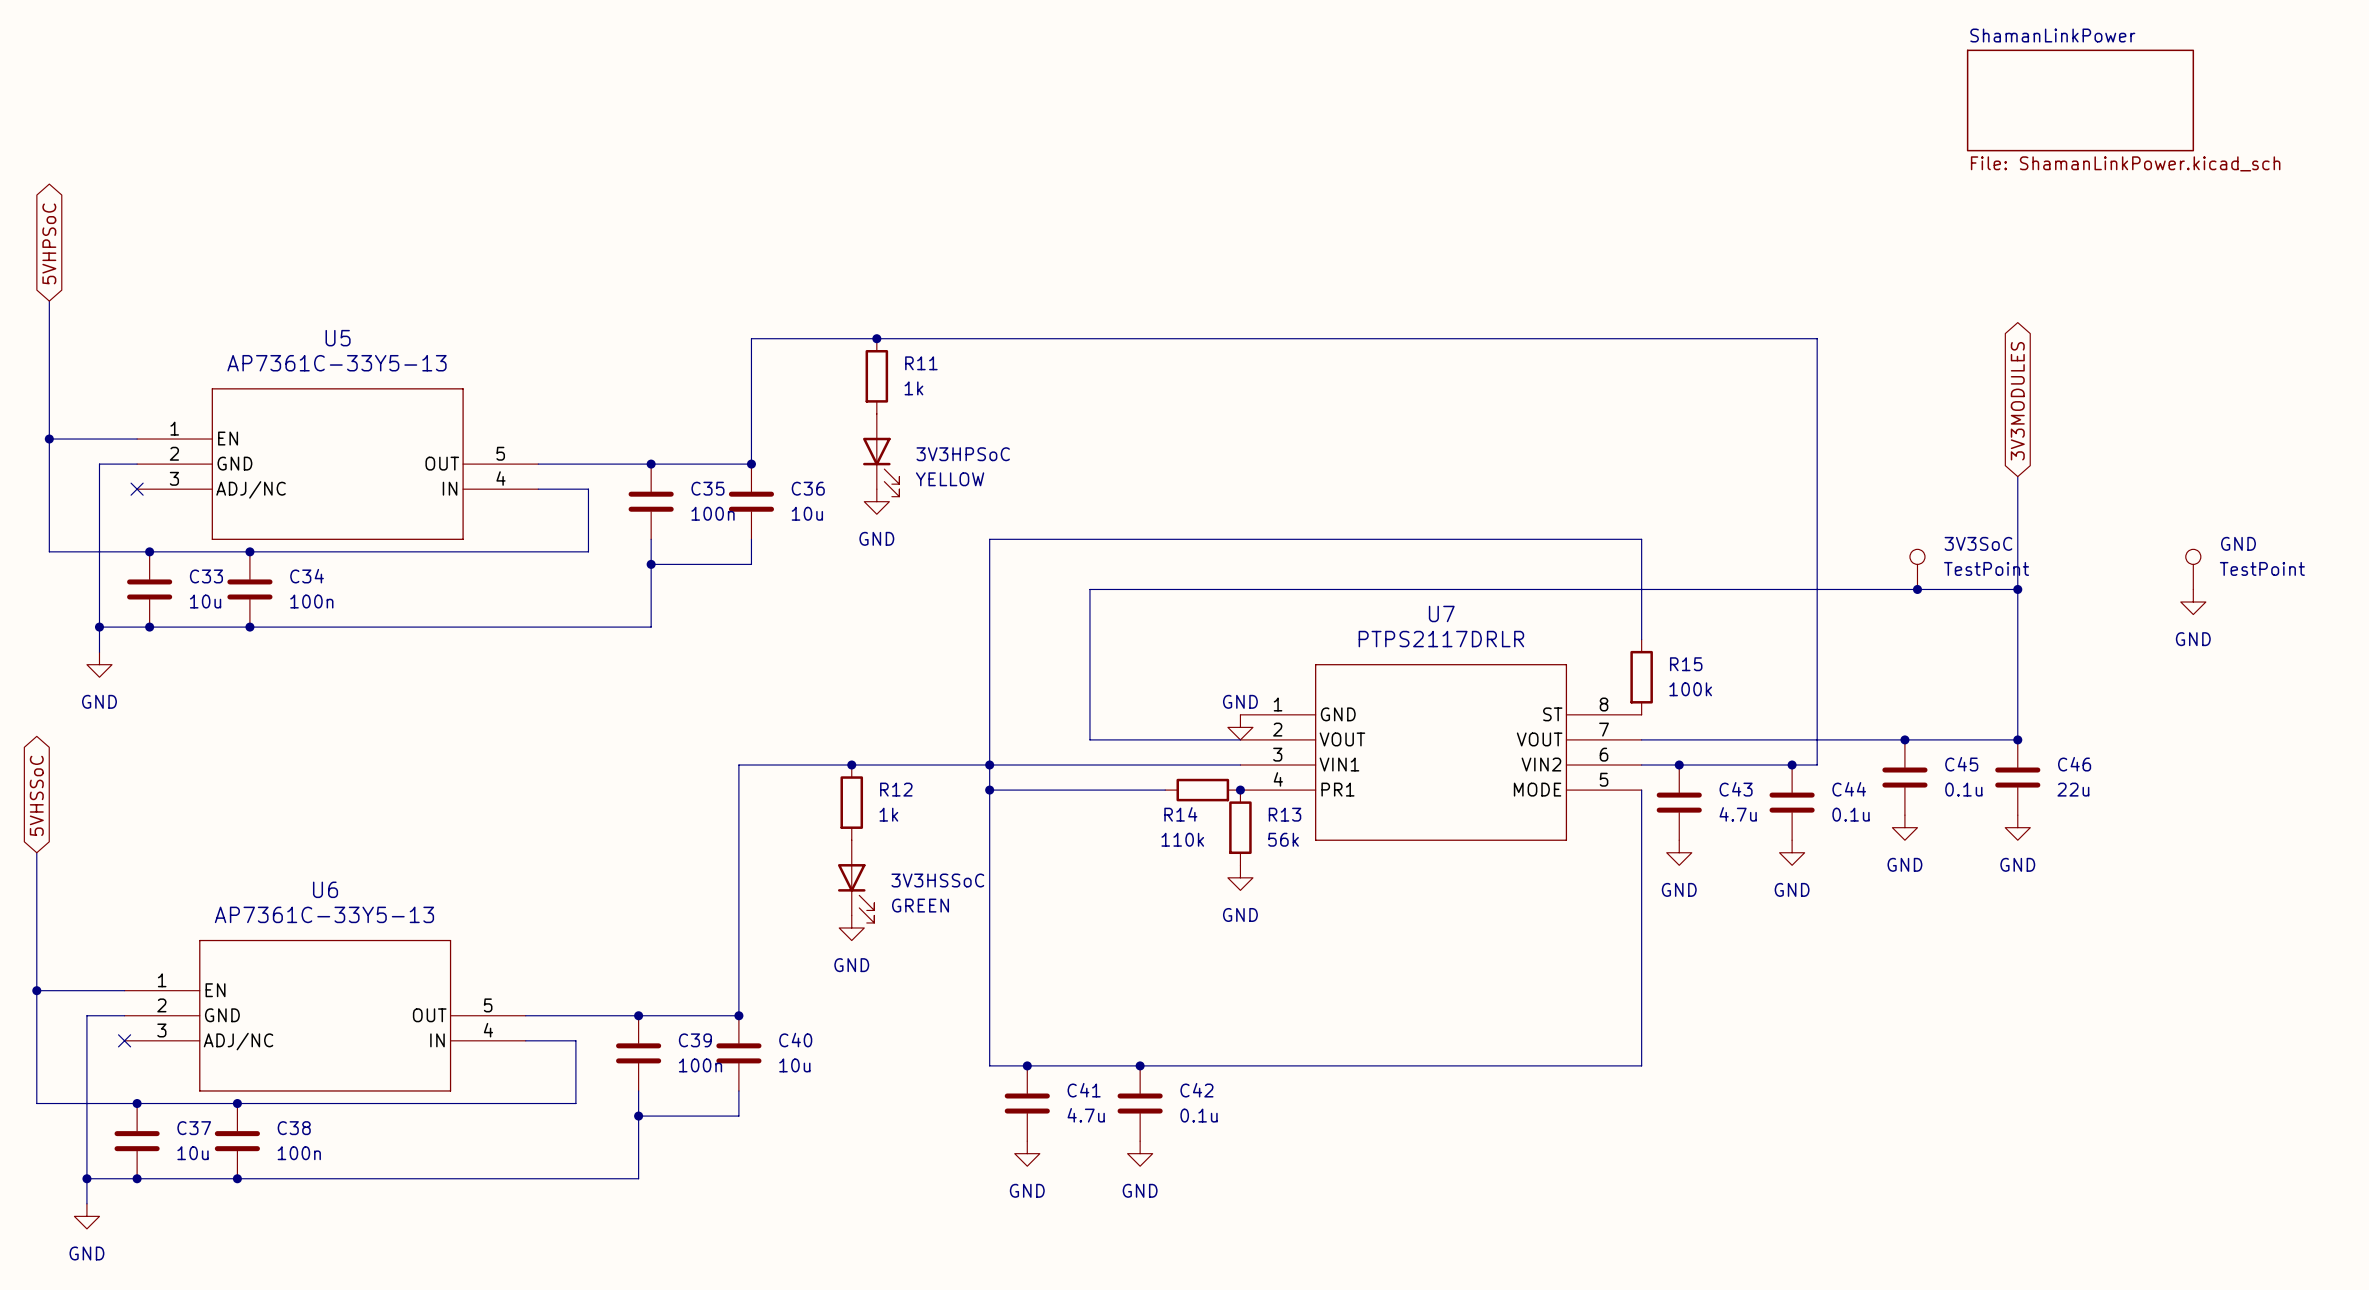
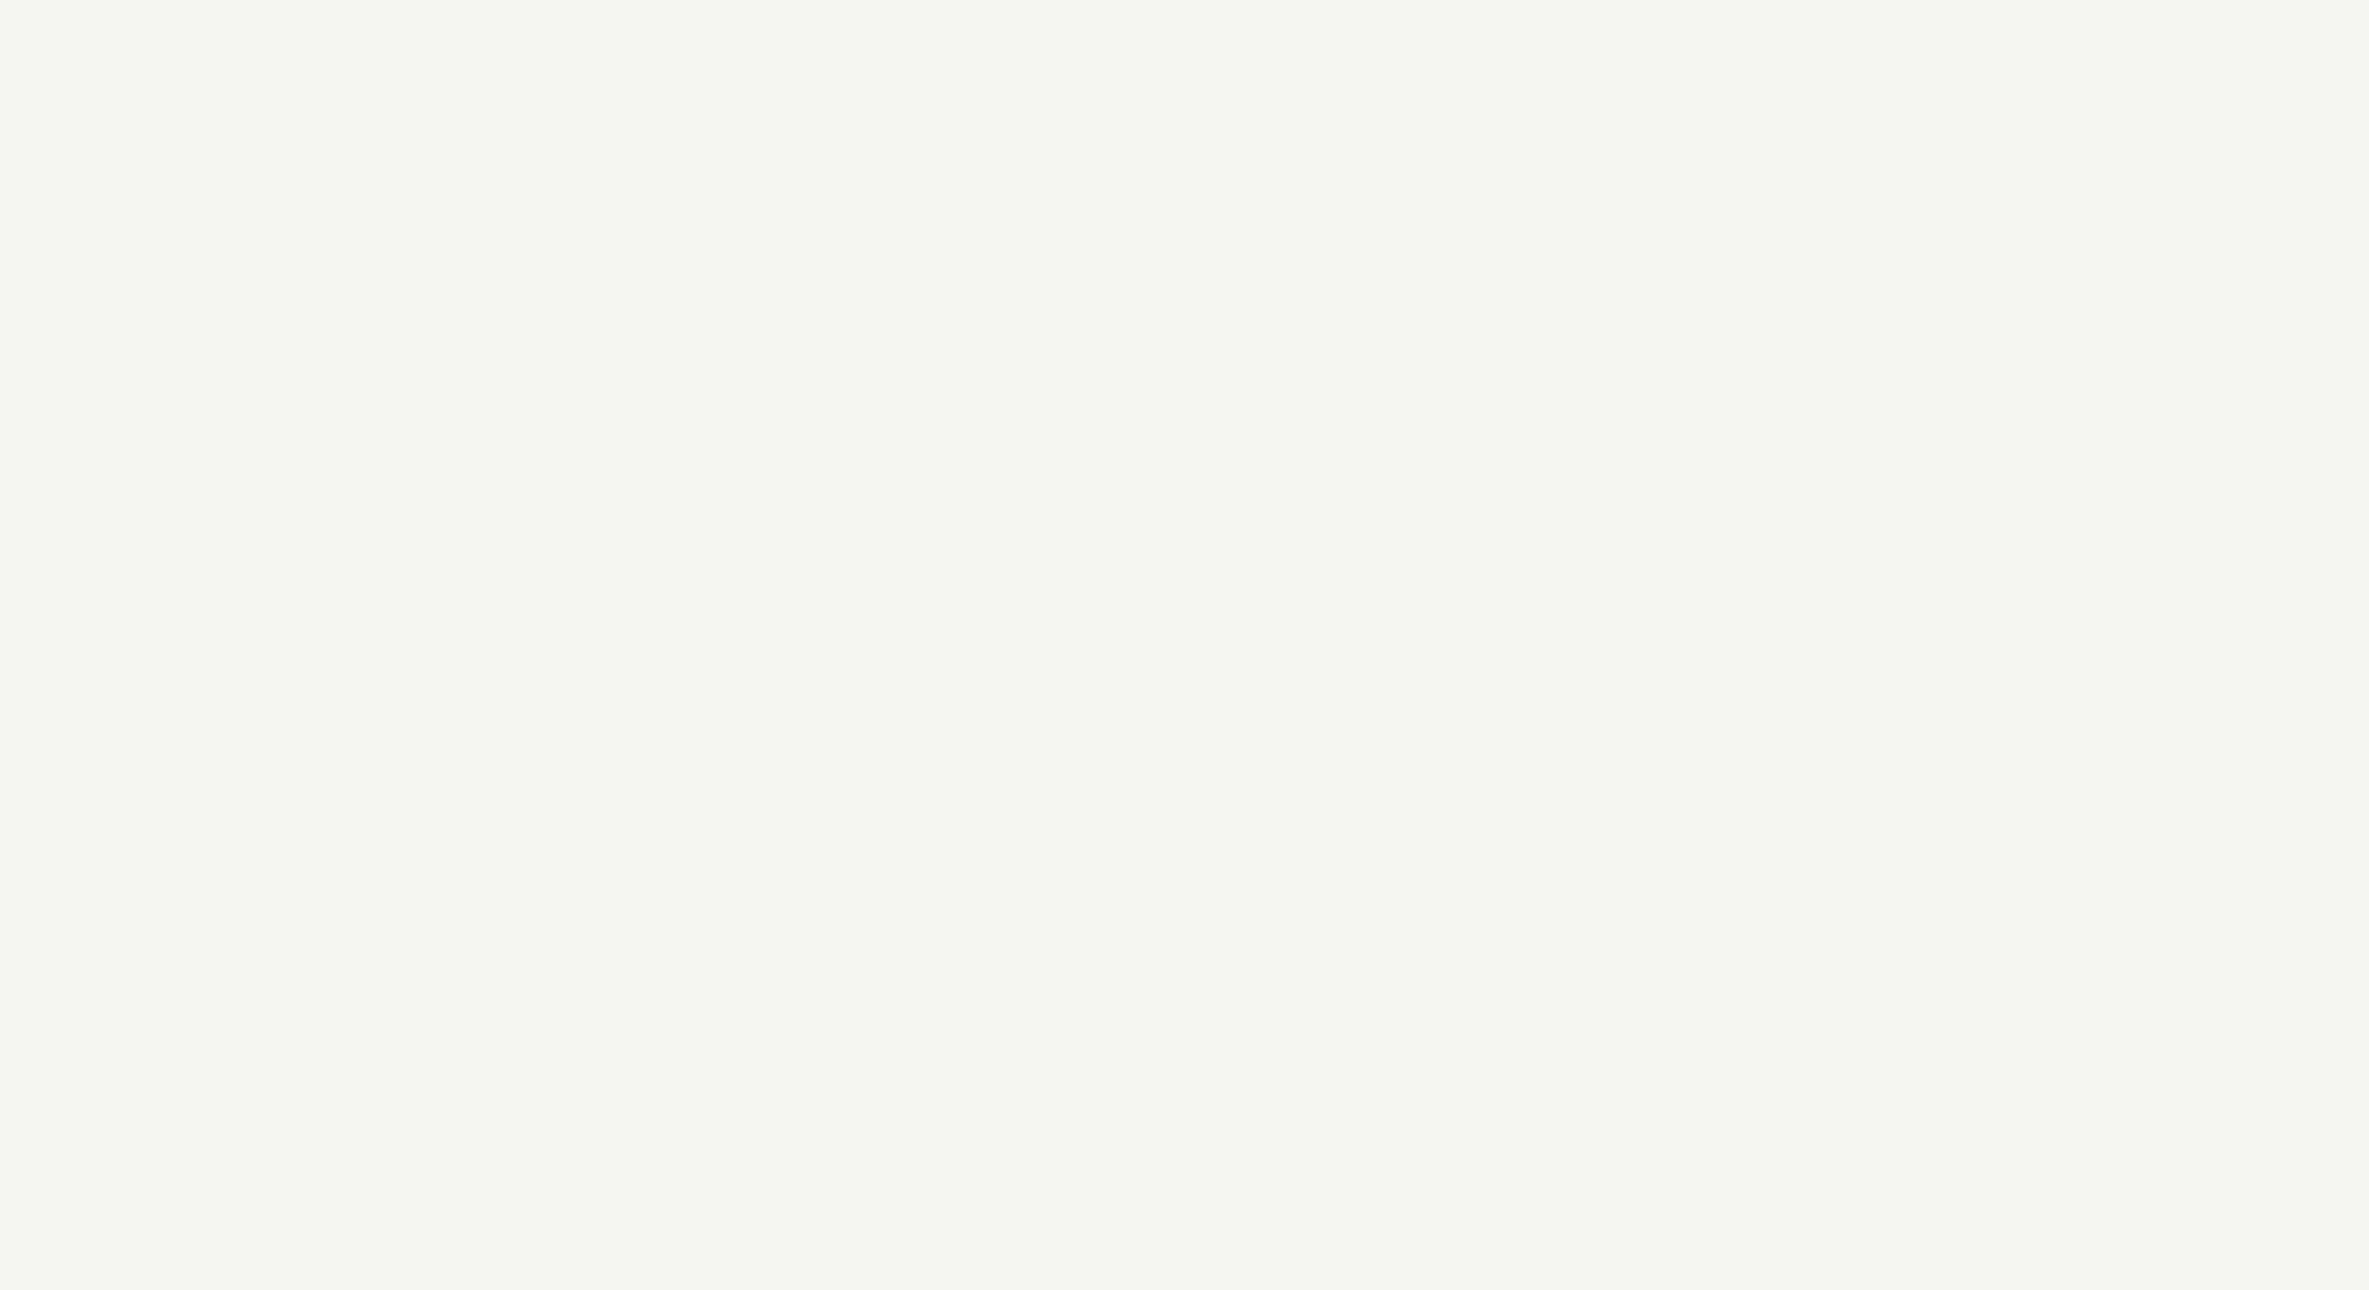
sheet ShamanLinkPower: File: ShamanLinkPower.kicad_sch (2080, 100) -> none
global label: 5VHPSoC (49, 243) -> none
wire: (49, 301) (49, 551) (588, 551) (588, 489) (538, 489) -> none
junction: (876, 338) -> none
R11: 1k (876, 376) -> none
global label: 3V3MODULES (2017, 401) -> none
wire: (49, 439) (137, 439) -> none
junction: (49, 439) -> none
3V3HPSoC: YELLOW (881, 455) -> none
wire: (137, 464) (99, 464) (99, 652) -> none
U5: AP7361C-33Y5-13 (337, 464) -> none
wire: (538, 464) (751, 464) (751, 338) (1817, 338) (1817, 765) (1641, 765) -> none
junction: (651, 464) -> none
junction: (751, 464) -> none
wire: (2017, 476) (2017, 739) (1641, 739) -> none
no-connect mark: (137, 489) -> none
C35: 100n (651, 501) -> none
C36: 10u (751, 501) -> none
power symbol: GND (876, 501) -> none
wire: (651, 539) (651, 627) (99, 627) -> none
wire: (751, 539) (751, 564) (651, 564) -> none
junction: (149, 551) -> none
junction: (249, 551) -> none
junction: (651, 564) -> none
3V3SoC: TestPoint (1917, 569) -> none
GND: TestPoint (2193, 569) -> none
C33: 10u (149, 589) -> none
C34: 100n (249, 589) -> none
junction: (1917, 589) -> none
wire: (2017, 589) (1089, 589) (1089, 739) (1240, 739) -> none
junction: (2017, 589) -> none
power symbol: GND (2193, 602) -> none
junction: (99, 627) -> none
junction: (149, 627) -> none
junction: (249, 627) -> none
wire: (1641, 639) (1641, 539) (989, 539) (989, 1065) (1641, 1065) (1641, 790) -> none
power symbol: GND (99, 664) -> none
R15: 100k (1641, 677) -> none
power symbol: GND (1240, 727) -> none
junction: (1904, 739) -> none
junction: (2017, 739) -> none
U7: PTPS2117DRLR (1441, 752) -> none
junction: (851, 765) -> none
junction: (989, 765) -> none
wire: (1240, 765) (738, 765) (738, 1015) (525, 1015) -> none
junction: (1679, 765) -> none
junction: (1792, 765) -> none
C45: 0.1u (1904, 777) -> none
C46: 22u (2017, 777) -> none
wire: (989, 790) (1165, 790) -> none
junction: (989, 790) -> none
R14: 110k (1202, 790) -> none
junction: (1240, 790) -> none
global label: 5VHSSoC (36, 795) -> none
R12: 1k (851, 802) -> none
C43: 4.7u (1679, 802) -> none
C44: 0.1u (1792, 802) -> none
R13: 56k (1240, 827) -> none
power symbol: GND (1904, 827) -> none
power symbol: GND (2017, 827) -> none
wire: (36, 852) (36, 1103) (575, 1103) (575, 1040) (525, 1040) -> none
power symbol: GND (1679, 852) -> none
power symbol: GND (1792, 852) -> none
power symbol: GND (1240, 877) -> none
3V3HSSoC: GREEN (856, 881) -> none
power symbol: GND (851, 927) -> none
wire: (36, 990) (124, 990) -> none
junction: (36, 990) -> none
wire: (124, 1015) (86, 1015) (86, 1203) -> none
U6: AP7361C-33Y5-13 (325, 1015) -> none
junction: (638, 1015) -> none
junction: (738, 1015) -> none
no-connect mark: (124, 1040) -> none
C39: 100n (638, 1053) -> none
C40: 10u (738, 1053) -> none
junction: (1027, 1065) -> none
junction: (1140, 1065) -> none
wire: (638, 1090) (638, 1178) (86, 1178) -> none
wire: (738, 1090) (738, 1116) (638, 1116) -> none
junction: (137, 1103) -> none
junction: (237, 1103) -> none
C41: 4.7u (1027, 1103) -> none
C42: 0.1u (1140, 1103) -> none
junction: (638, 1116) -> none
C37: 10u (137, 1141) -> none
C38: 100n (237, 1141) -> none
power symbol: GND (1027, 1153) -> none
power symbol: GND (1140, 1153) -> none
junction: (86, 1178) -> none
junction: (137, 1178) -> none
junction: (237, 1178) -> none
power symbol: GND (86, 1216) -> none

